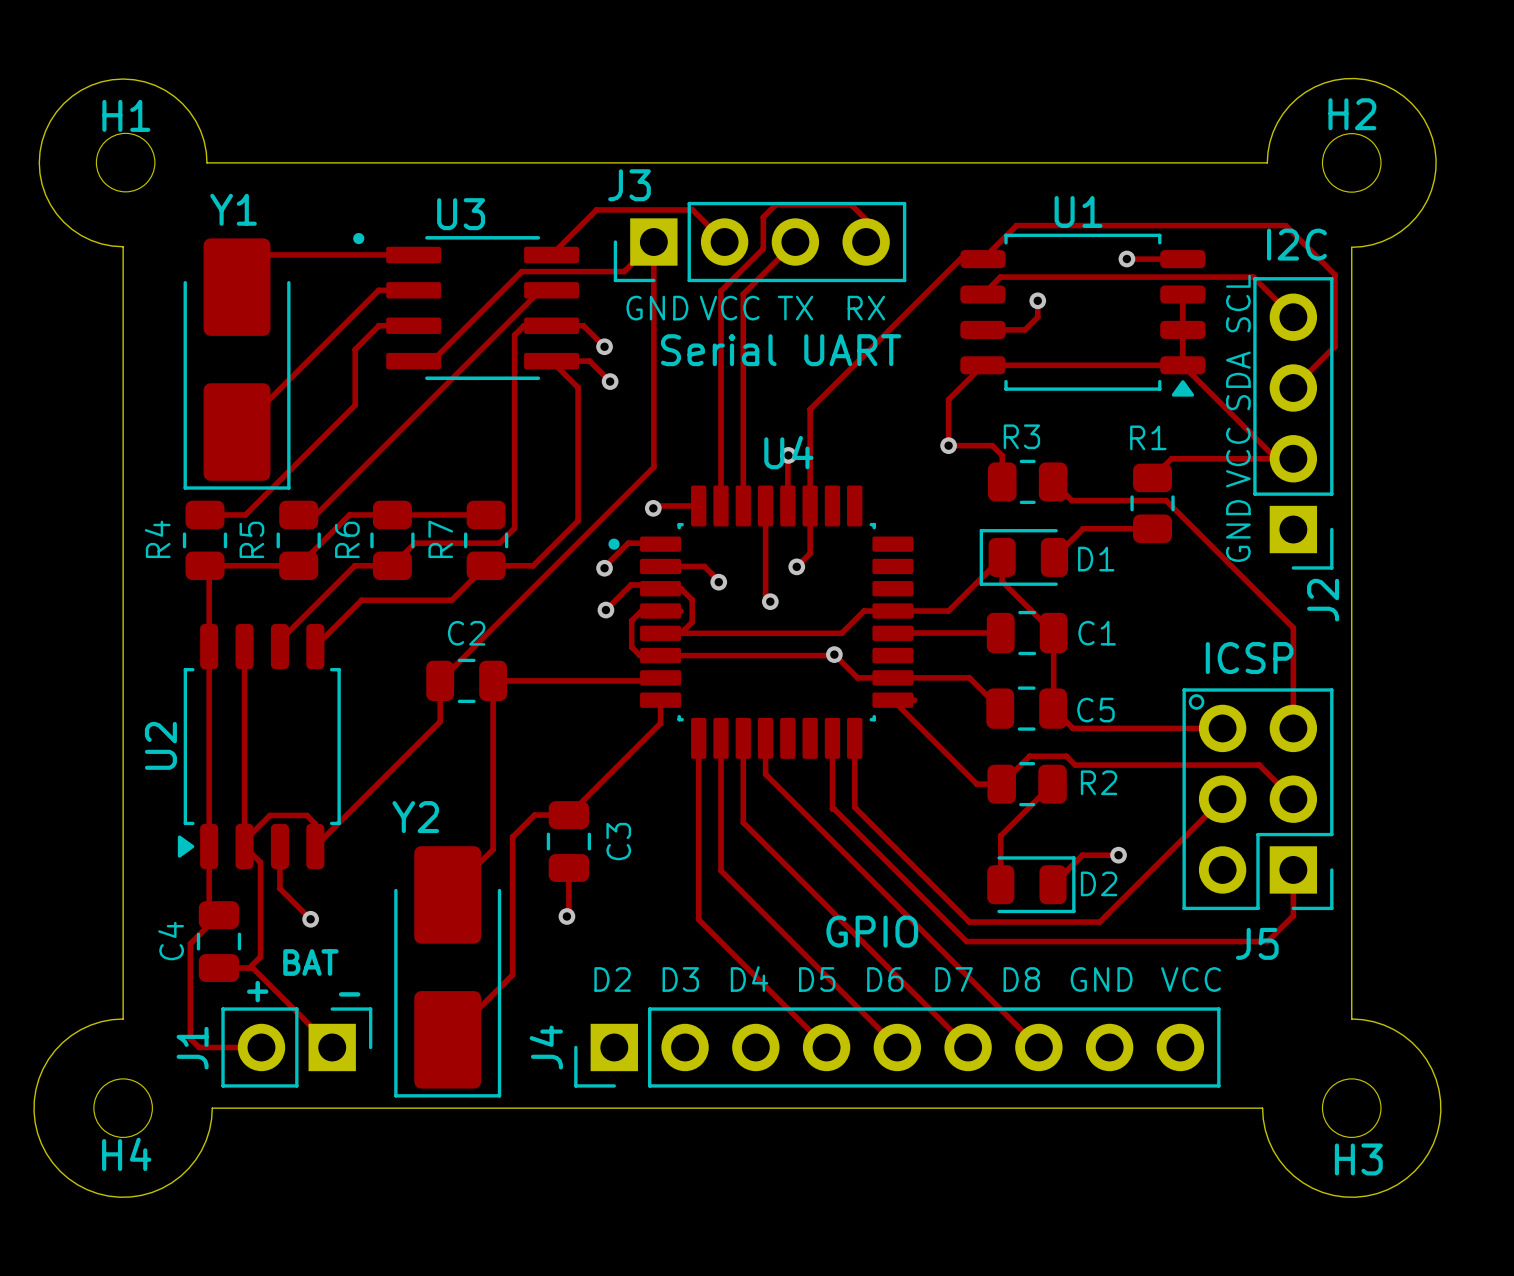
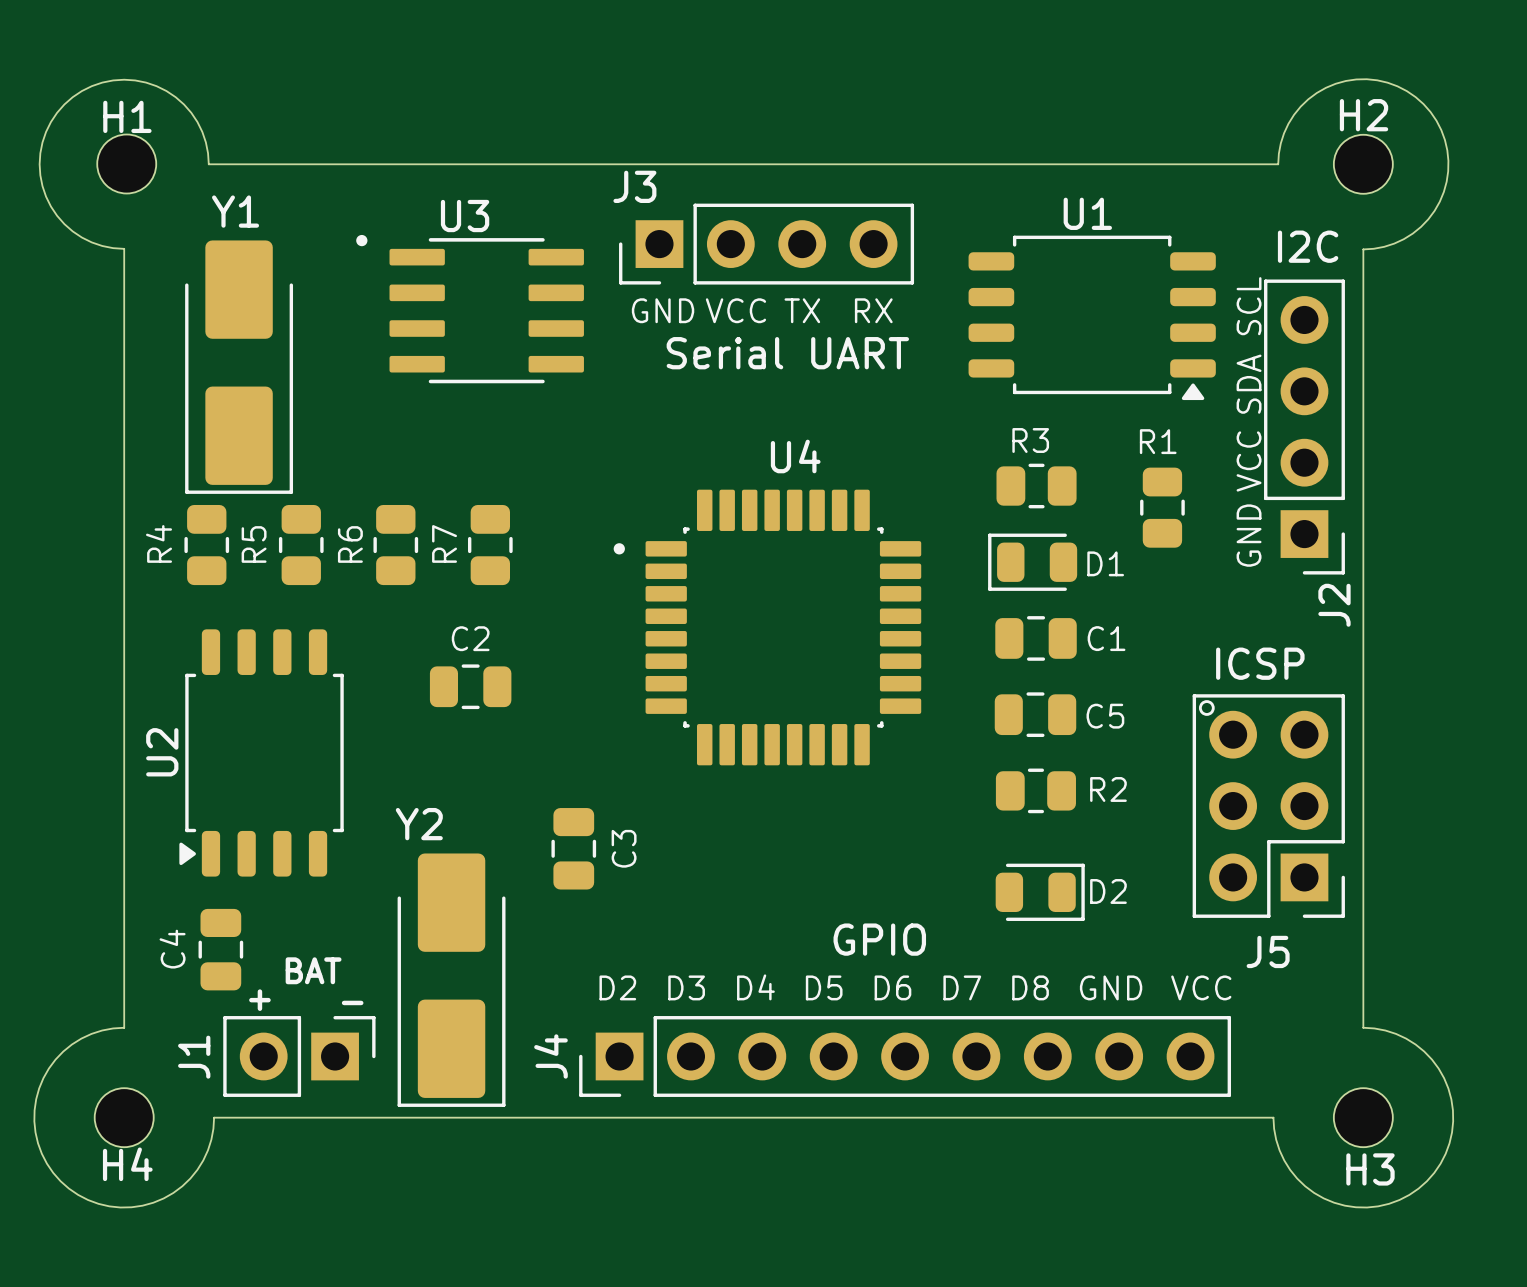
track: (724, 242) (692, 209) (596, 209) (551, 254) -> none
track: (795, 242) (743, 294) (743, 505) -> none
track: (866, 242) (866, 219) (851, 204) (775, 204) (763, 217) (763, 248) (721, 290) (721, 505) -> none
track: (413, 254) (269, 254) (237, 287) -> none
via: (1126, 259) -> none
track: (1127, 259) (1182, 259) -> none
track: (413, 290) (378, 290) (237, 432) -> none
track: (551, 290) (540, 290) (315, 514) (298, 514) -> none
track: (982, 294) (1000, 277) (1253, 277) (1293, 317) -> none
track: (1182, 294) (1182, 365) -> none
track: (1037, 300) (1037, 317) (1025, 329) (982, 329) -> none
via: (1037, 300) -> none
track: (413, 325) (379, 325) (355, 349) (355, 405) (245, 514) (204, 514) -> none
track: (604, 346) (583, 325) (524, 325) (514, 335) (514, 528) (499, 543) (415, 543) (392, 565) (354, 565) (279, 640) (279, 646) -> none
via: (604, 346) -> none
track: (413, 361) (432, 361) (521, 271) (624, 271) (653, 242) (653, 467) (440, 680) (440, 721) (315, 846) (315, 823) (306, 815) (269, 815) (244, 840) -> none
track: (1182, 365) (982, 365) (948, 399) (948, 445) (992, 445) (1002, 455) (1002, 481) -> none
track: (1182, 365) (1276, 458) -> none
track: (610, 381) (589, 361) (551, 361) (578, 387) (578, 520) (533, 565) (486, 565) (451, 600) (361, 600) (315, 646) -> none
via: (610, 381) -> none
track: (1293, 387) (1334, 346) (1334, 274) (1285, 225) (1016, 225) (982, 259) (960, 259) (810, 409) (810, 553) (796, 566) -> none
via: (948, 445) -> none
track: (788, 455) (787, 505) -> none
via: (788, 455) -> none
track: (1293, 458) (1171, 458) (1152, 477) -> none
track: (1053, 481) (1071, 500) (1166, 500) (1293, 627) (1293, 728) -> none
track: (698, 505) (655, 505) (653, 508) -> none
track: (765, 505) (765, 596) (770, 601) -> none
via: (653, 508) -> none
track: (486, 514) (349, 514) (298, 565) (204, 565) (204, 570) (209, 574) (209, 905) (218, 915) (190, 943) (190, 1038) (199, 1047) (261, 1047) -> none
track: (1152, 528) (1083, 528) (1054, 557) -> none
track: (660, 544) (628, 543) (604, 568) -> none
track: (660, 566) (704, 566) (718, 582) -> none
via: (796, 566) -> none
via: (604, 568) -> none
via: (718, 582) -> none
via: (770, 601) -> none
track: (605, 610) (630, 584) (656, 584) (660, 588) (681, 588) (692, 599) (692, 622) (681, 633) -> none
via: (605, 610) -> none
track: (681, 611) (641, 611) (631, 620) (631, 647) (640, 655) (834, 654) (857, 677) (969, 677) (1000, 708) -> none
track: (660, 633) (841, 633) (864, 611) (948, 611) (1002, 557) (1002, 581) (1053, 633) (1053, 708) (1072, 728) (1222, 728) -> none
track: (893, 633) (1000, 633) -> none
track: (244, 646) (244, 846) (260, 862) (260, 956) (249, 968) -> none
via: (834, 654) -> none
track: (660, 677) (657, 680) (493, 680) (493, 849) (447, 894) -> none
track: (660, 700) (660, 723) (568, 815) (534, 815) (512, 837) (512, 974) (447, 1039) -> none
track: (914, 700) (892, 700) (976, 784) (1001, 784) (1029, 756) (1066, 756) (1075, 765) (1259, 765) (1293, 799) -> none
track: (698, 738) (698, 919) (826, 1047) -> none
track: (721, 738) (721, 870) (897, 1047) -> none
track: (743, 738) (743, 822) (968, 1047) -> none
track: (765, 738) (765, 774) (1038, 1047) -> none
track: (832, 738) (832, 808) (966, 941) (1267, 941) (1293, 915) (1293, 869) -> none
track: (854, 738) (854, 807) (969, 922) (1099, 922) (1222, 799) -> none
track: (1052, 784) (1000, 835) (1000, 884) -> none
track: (279, 846) (279, 888) (310, 919) -> none
track: (1118, 855) (1082, 855) (1053, 884) -> none
via: (1118, 855) -> none
track: (568, 868) (568, 914) (566, 916) -> none
via: (566, 916) -> none
via: (310, 919) -> none
track: (218, 968) (252, 968) (332, 1047) -> none

